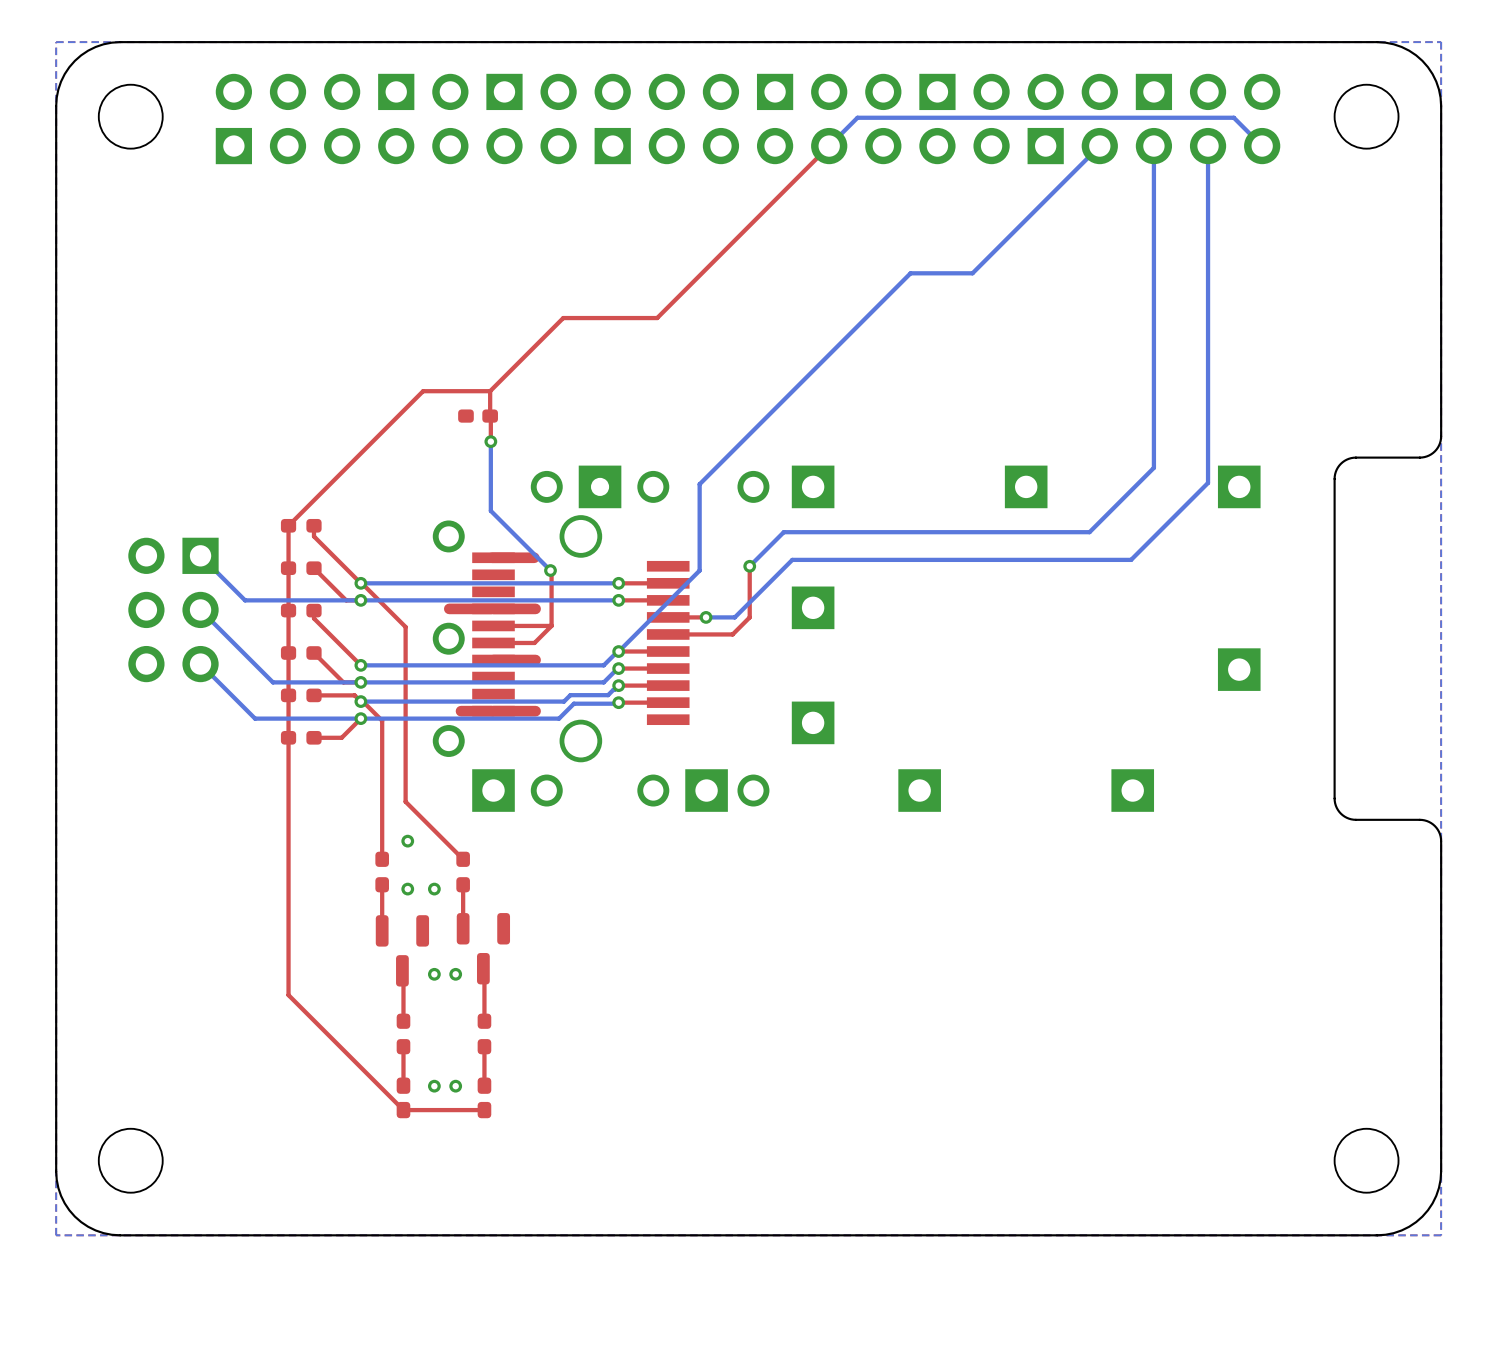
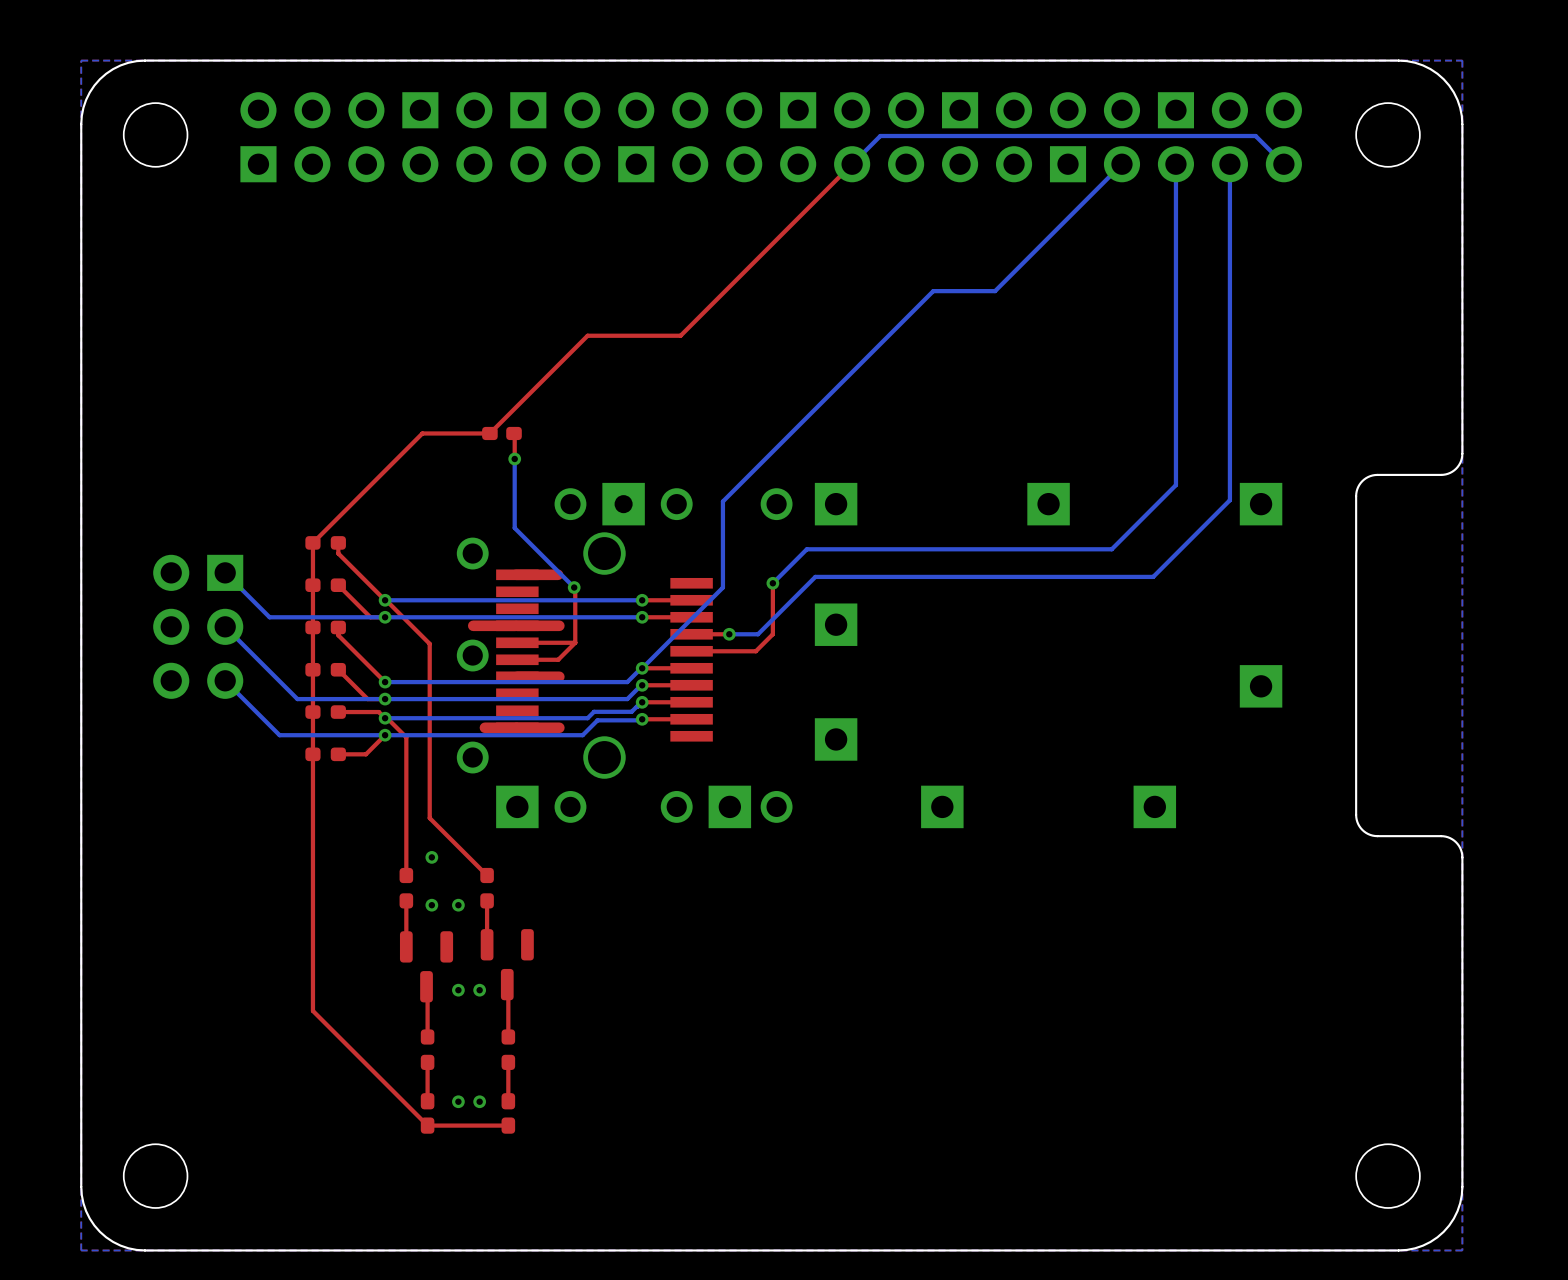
top track: (563, 318) (490, 391) -> (587, 335) (489, 433) (422, 433)
top track: (490, 391) (490, 416) -> none
top track: (490, 391) (423, 391) (398, 416) -> none

